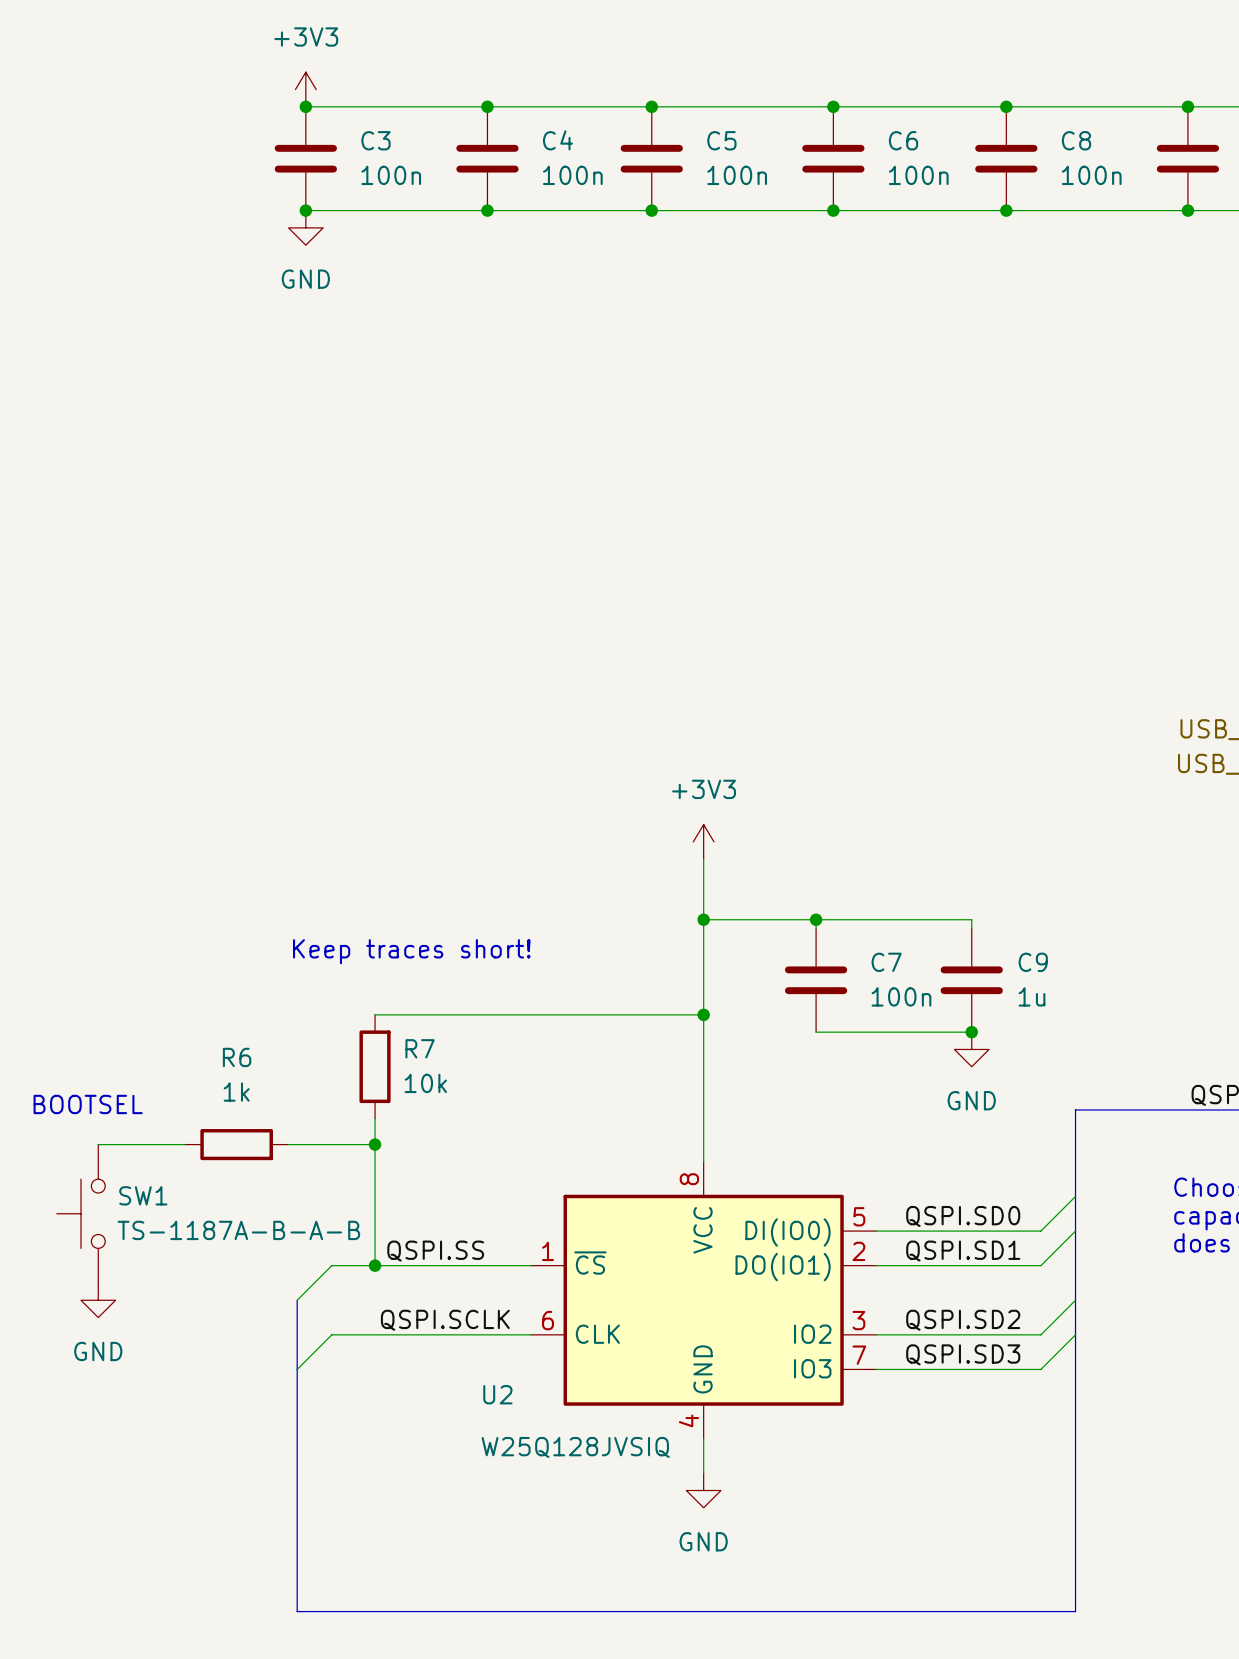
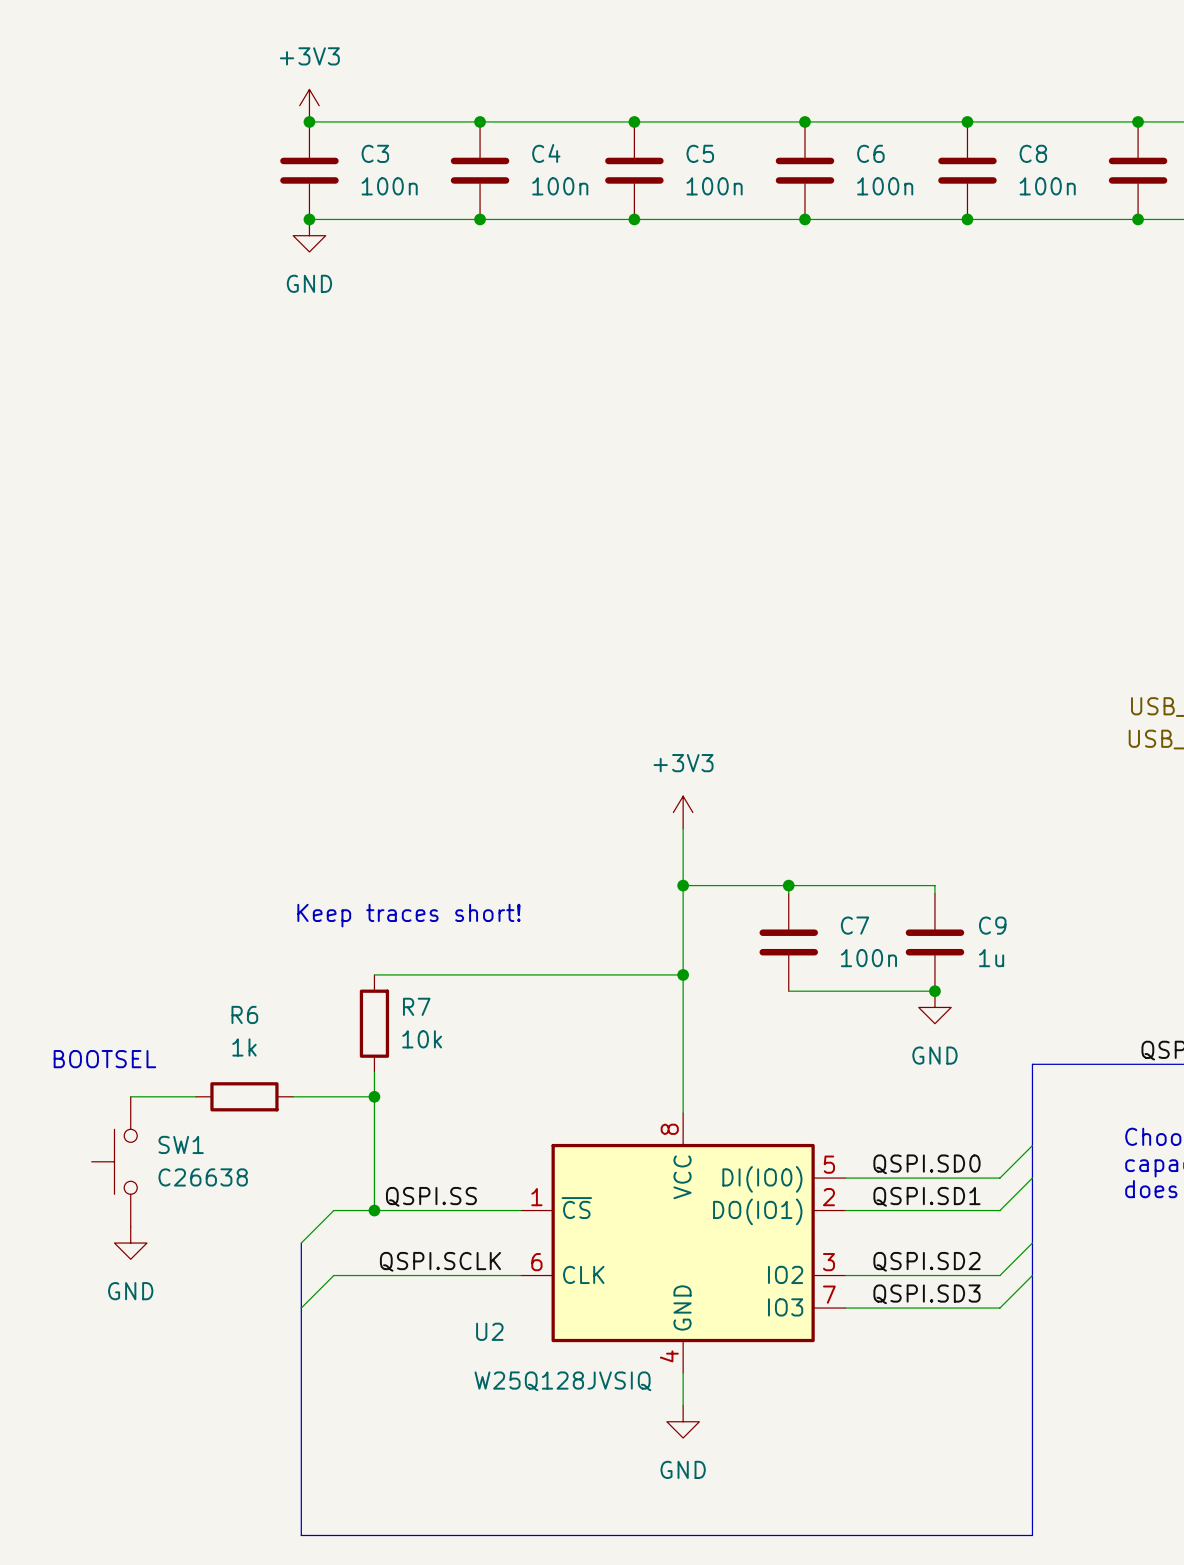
wire: (98, 1144) (115, 1144) -> none
SW1 name position: SW1 (143, 1195) -> SW1 (181, 1144)
SW1 position: (80, 1213) -> (114, 1161)
SW1 value: TS-1187A-B-A-B (238, 1230) -> C26638 (203, 1177)
power symbol position: GND (98, 1300) -> GND (130, 1243)

